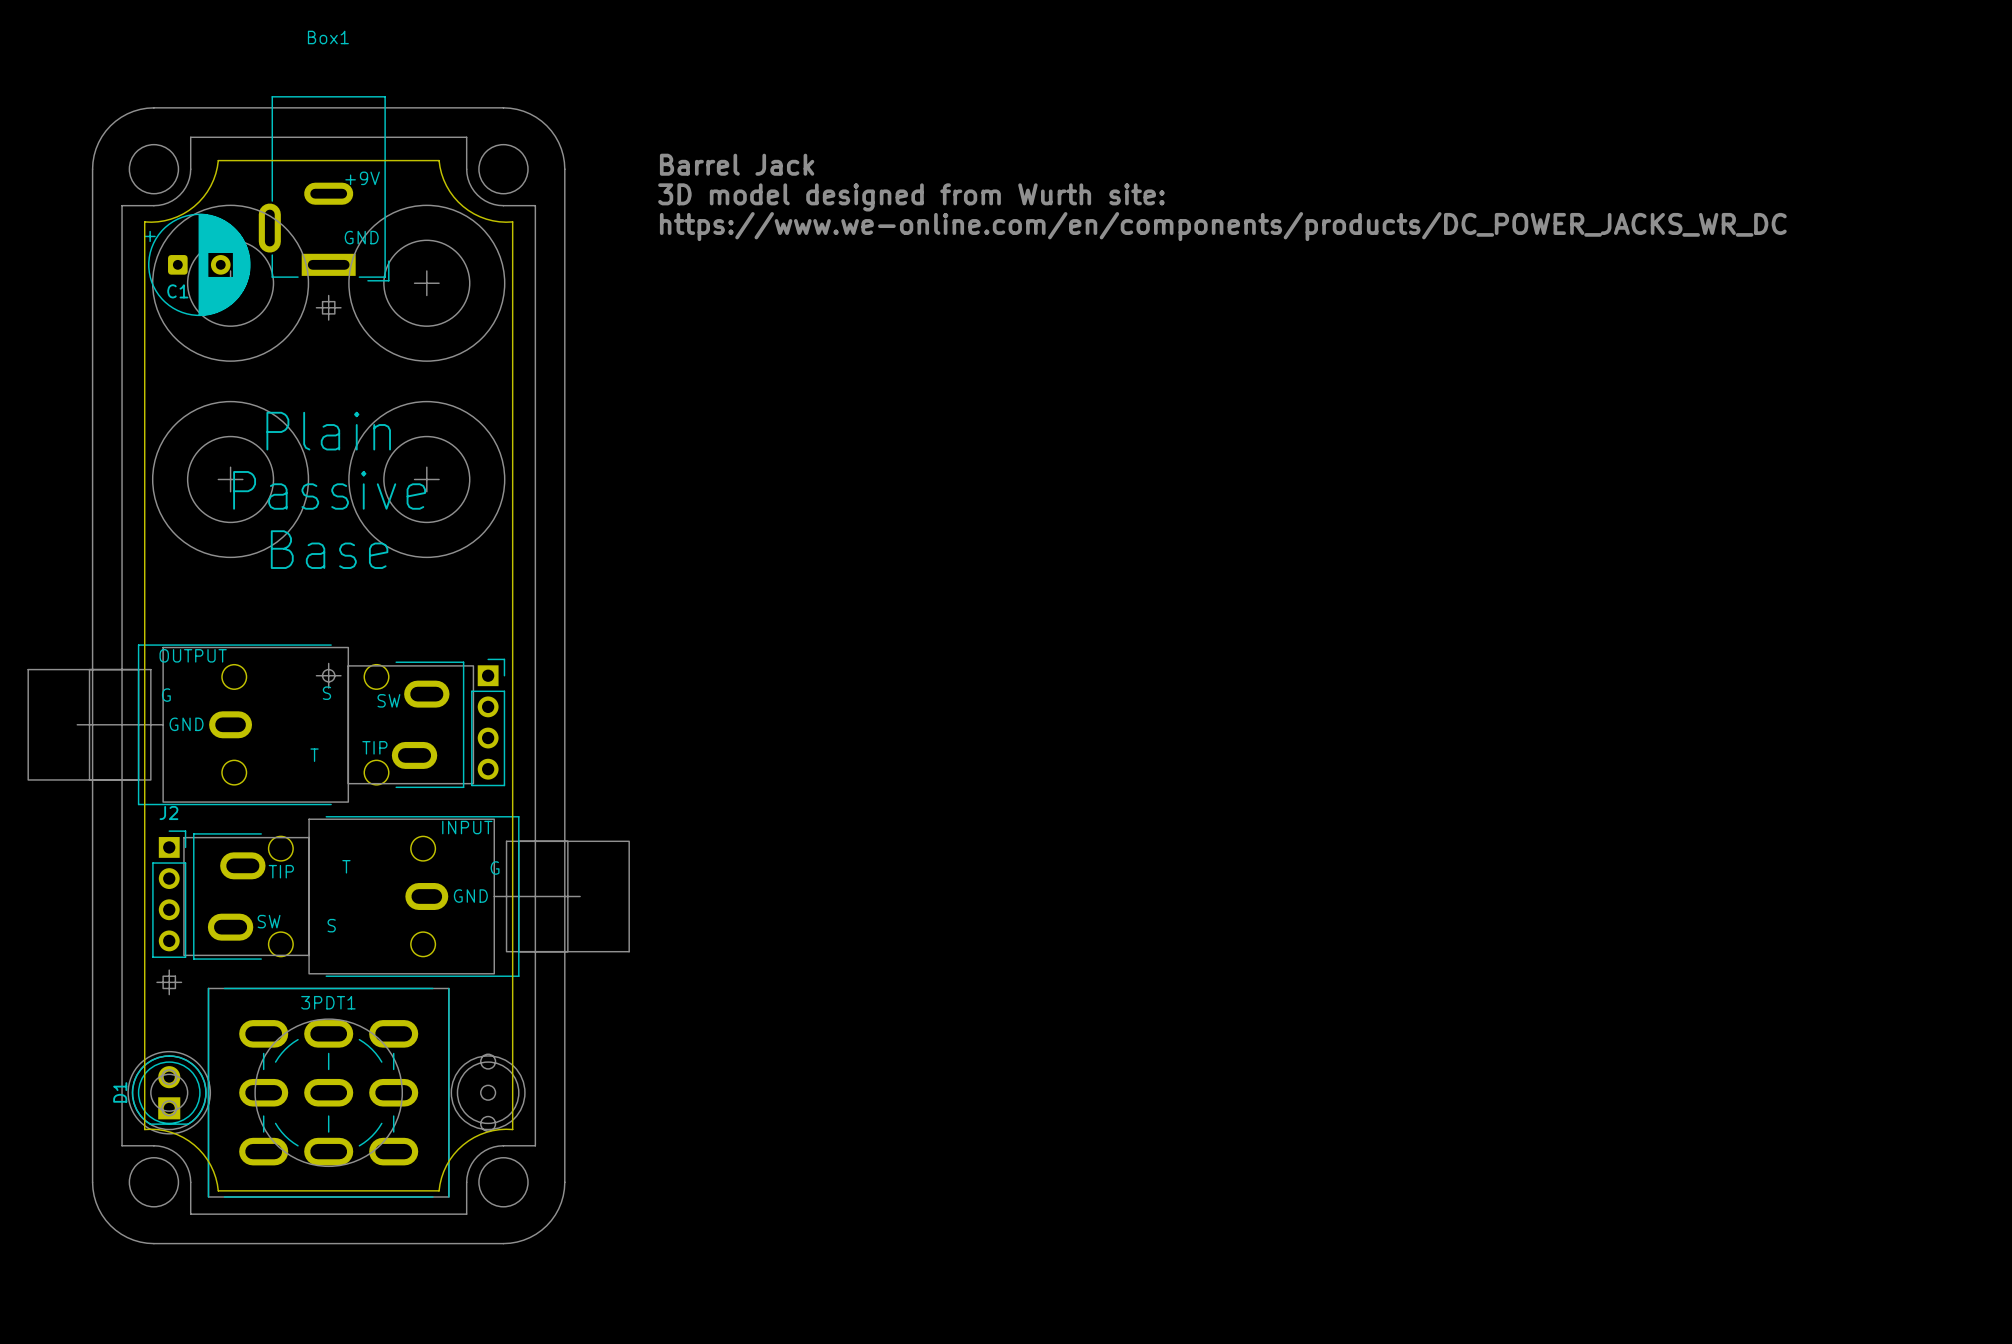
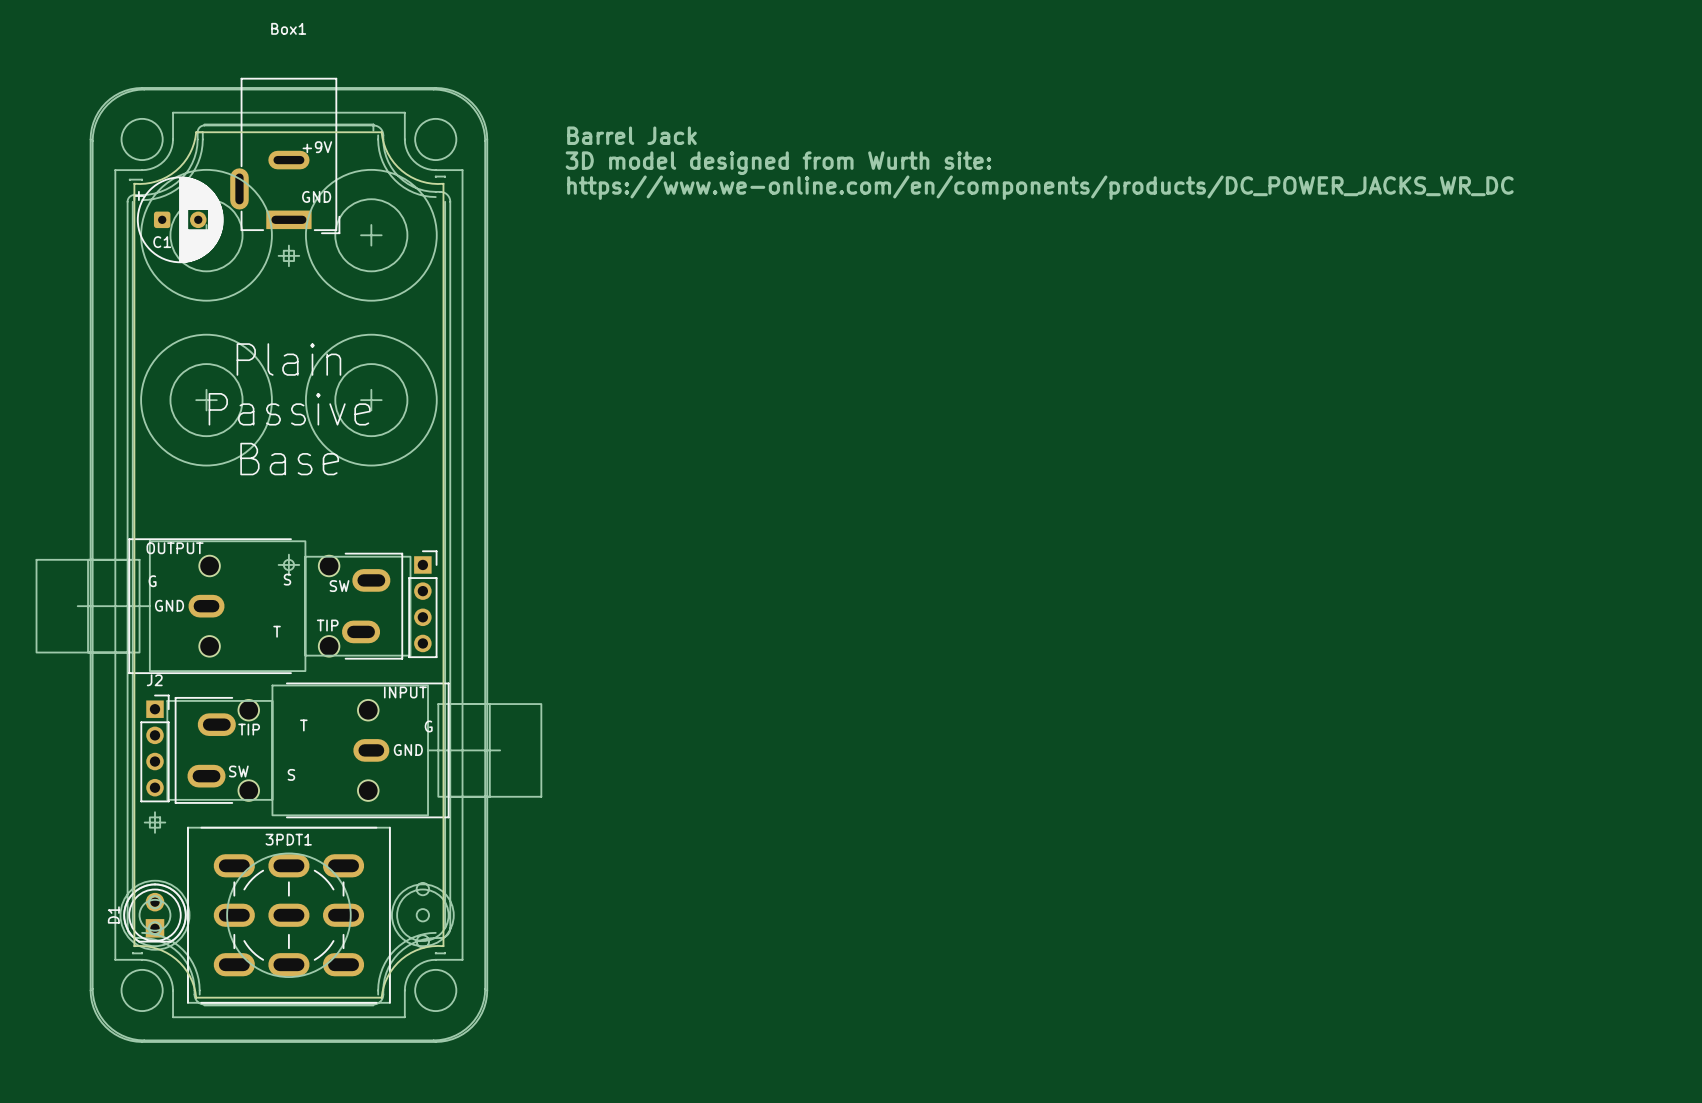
line: none -> (144, 89) (439, 89) (456, 94) (465, 100) (477, 113) (482, 124) (485, 141) (485, 988) (482, 1005) (477, 1016) (465, 1029) (450, 1037) (433, 1040) (138, 1040) (121, 1035) (112, 1029) (103, 1021) (95, 1005) (92, 988) (92, 141) (95, 124) (107, 104) (127, 92) (144, 89)
line: none -> (204, 124) (373, 124) (373, 130)
line: none -> (204, 125) (376, 126) (382, 132) (384, 151) (388, 162) (398, 176) (418, 188) (444, 192) (450, 199) (450, 929) (444, 937) (418, 940) (398, 953) (386, 973) (382, 998) (375, 1004) (201, 1003) (195, 997) (193, 978) (189, 967) (179, 953) (159, 940) (133, 937) (127, 930) (127, 201) (132, 195) (154, 193) (166, 189) (181, 178) (194, 157) (198, 129) (204, 125)
line: none -> (196, 132) (202, 132) (201, 151) (195, 168) (189, 177) (180, 186) (165, 195) (142, 200)
line: none -> (378, 135) (382, 161) (395, 180) (413, 192) (435, 197)
line: none -> (435, 177) (445, 177)
line: none -> (129, 180) (142, 180)
line: none -> (132, 201) (132, 928)
line: none -> (445, 201) (445, 928)
line: none -> (142, 932) (164, 937) (182, 949) (195, 968) (199, 994)
line: none -> (435, 932) (413, 937) (395, 949) (382, 968) (378, 994)
line: none -> (132, 952) (142, 952)
line: none -> (435, 952) (445, 952)
line: none -> (204, 1005) (373, 1005)

